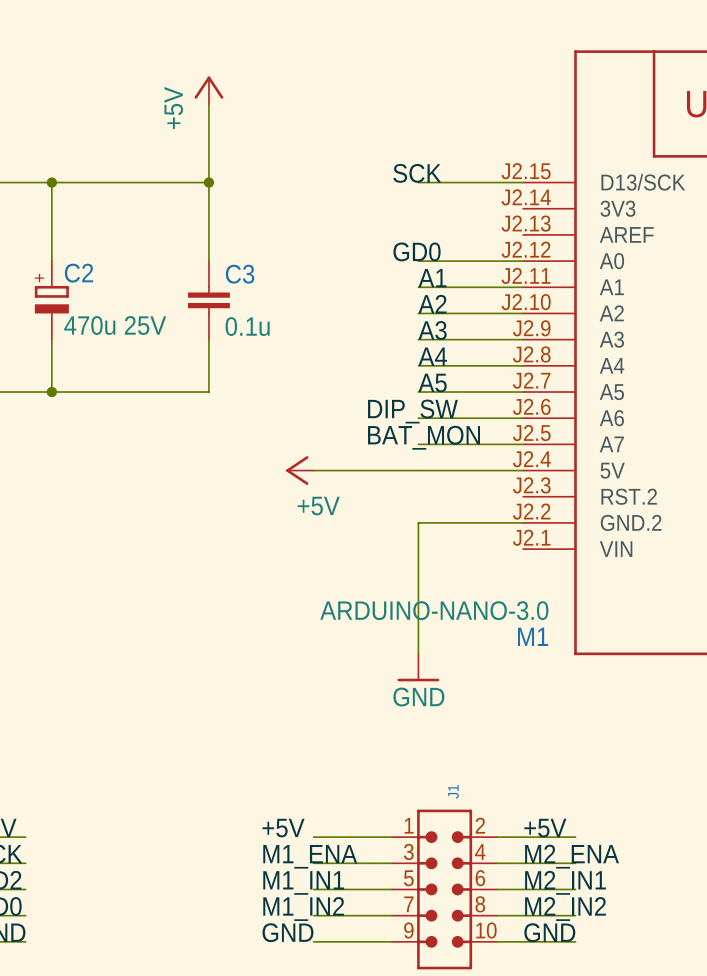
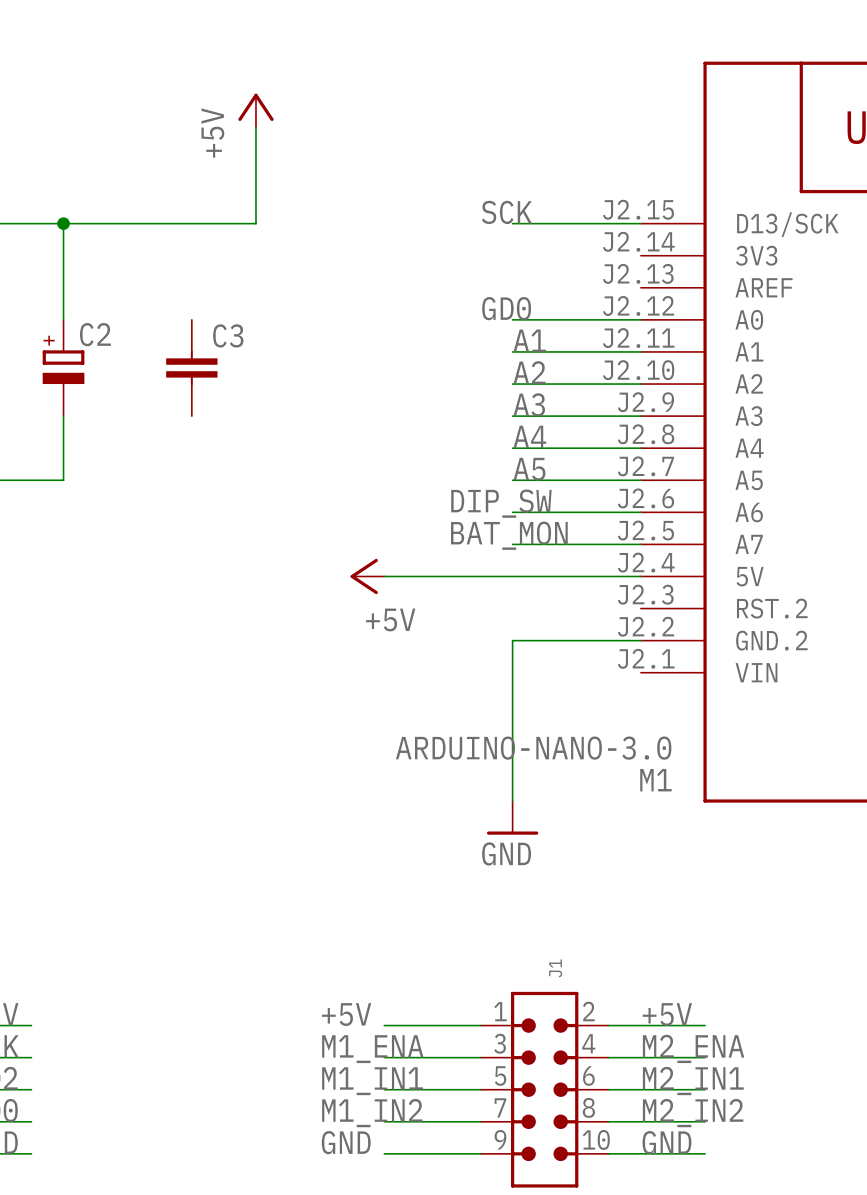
wire: (208, 182) (208, 261) -> none
junction: (208, 182) -> none
C3 position: (208, 300) -> (191, 367)
C2 value: 470u 25V (115, 325) -> none
C3 value: 0.1u (247, 326) -> none
wire: (208, 339) (208, 392) (51, 392) -> none
junction: (51, 392) -> none

